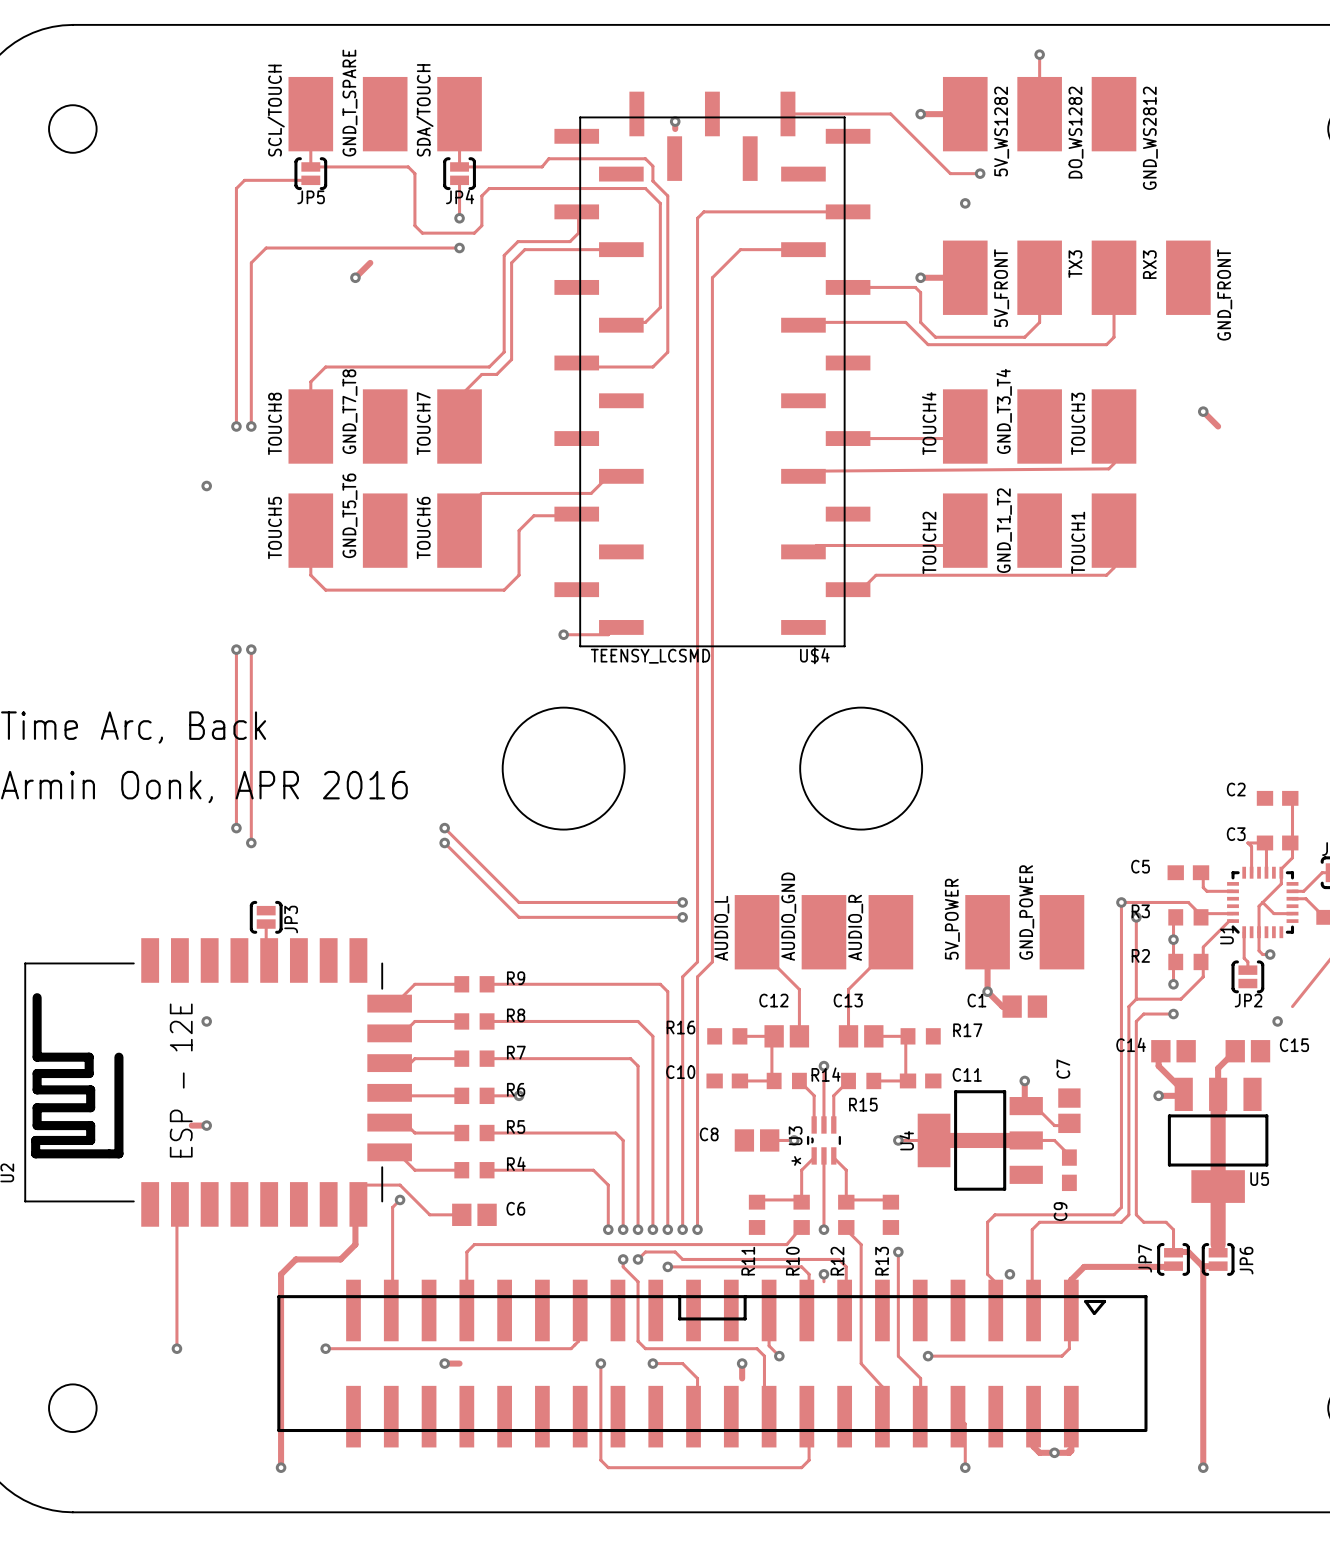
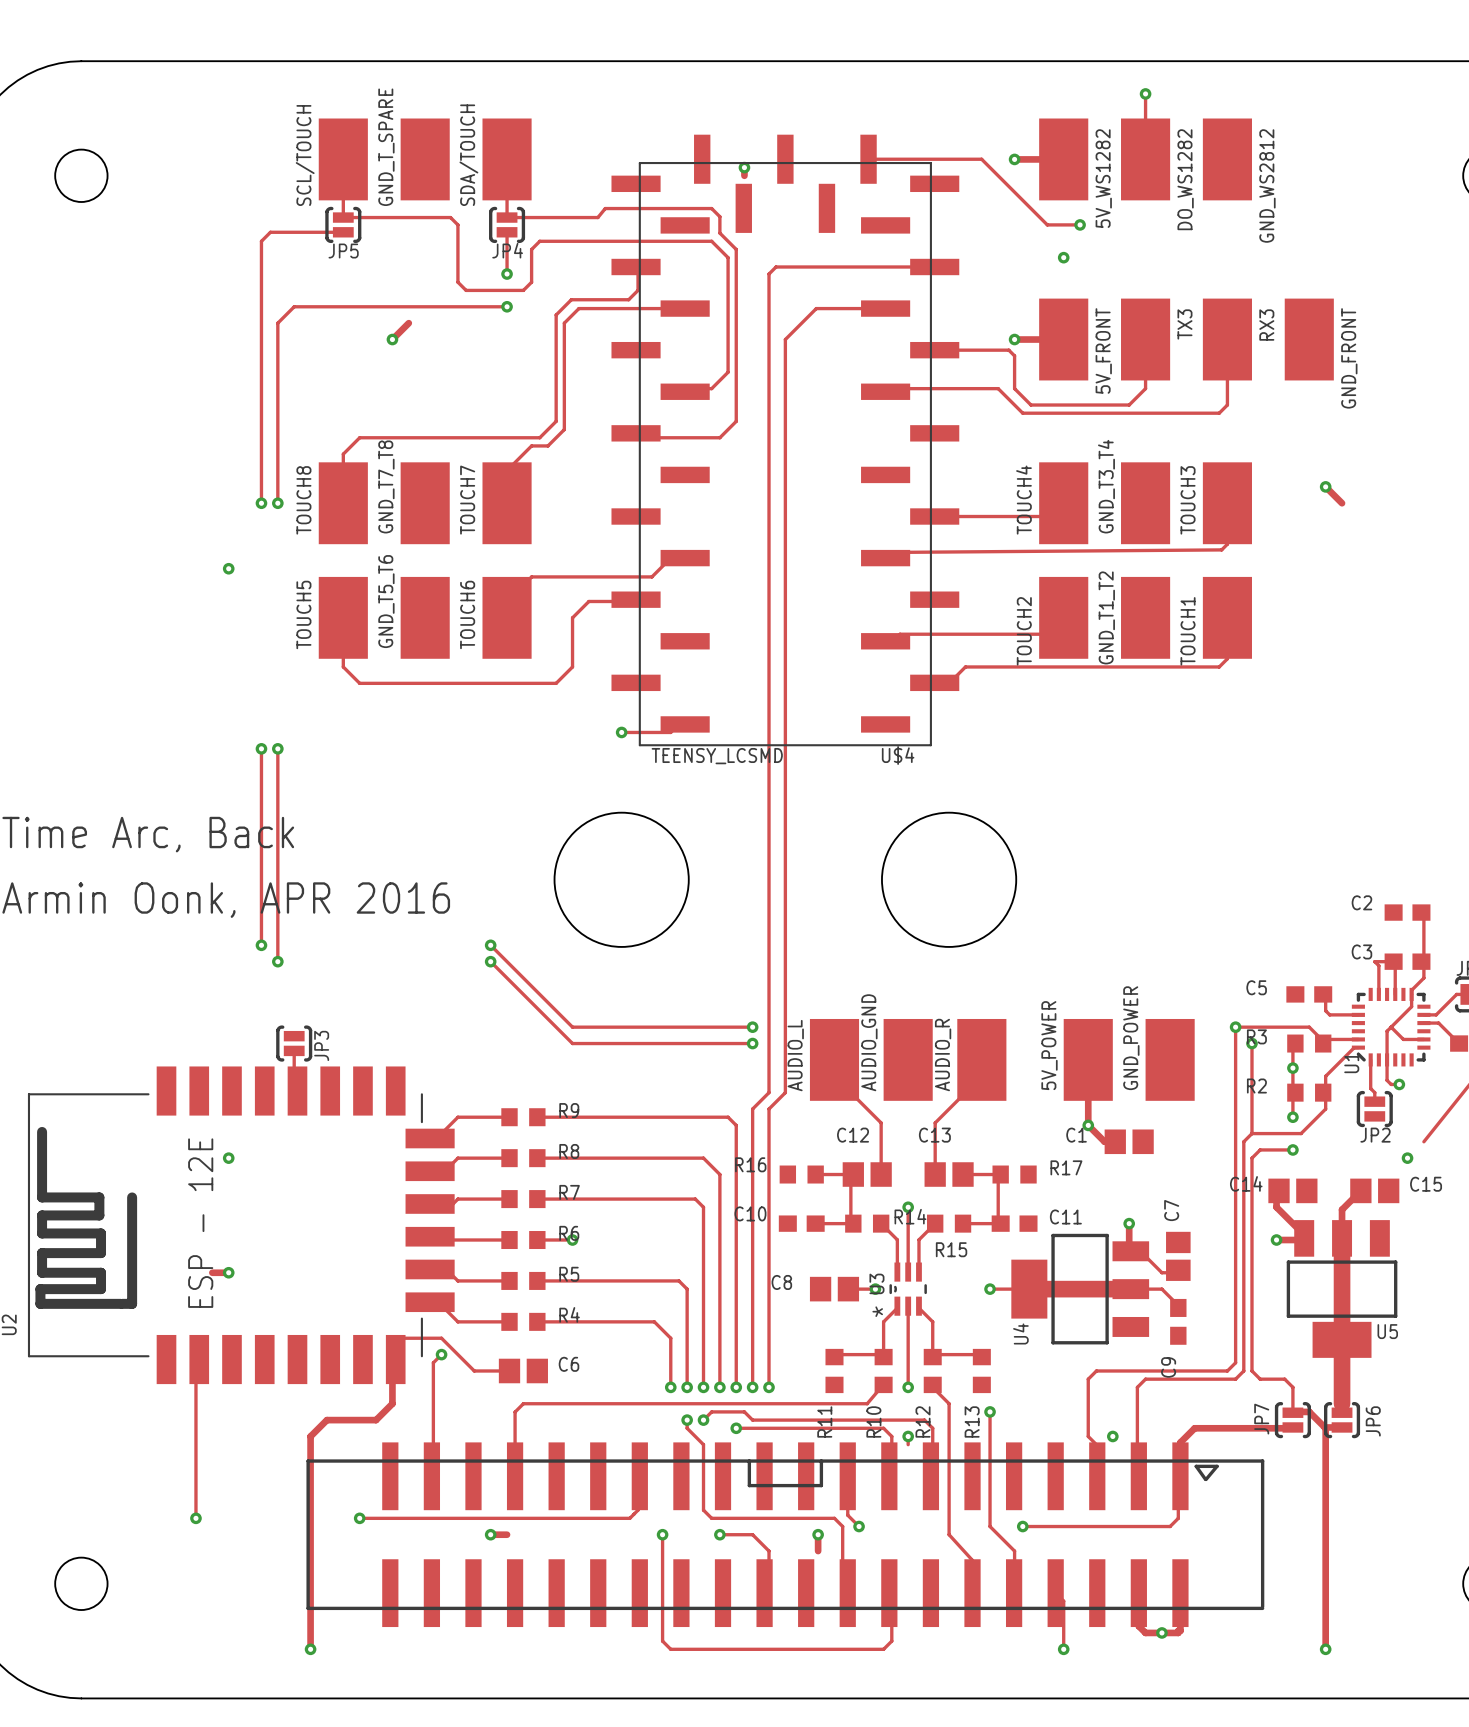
U4 name position: U4 (906, 1140) -> U4 (1020, 1333)

